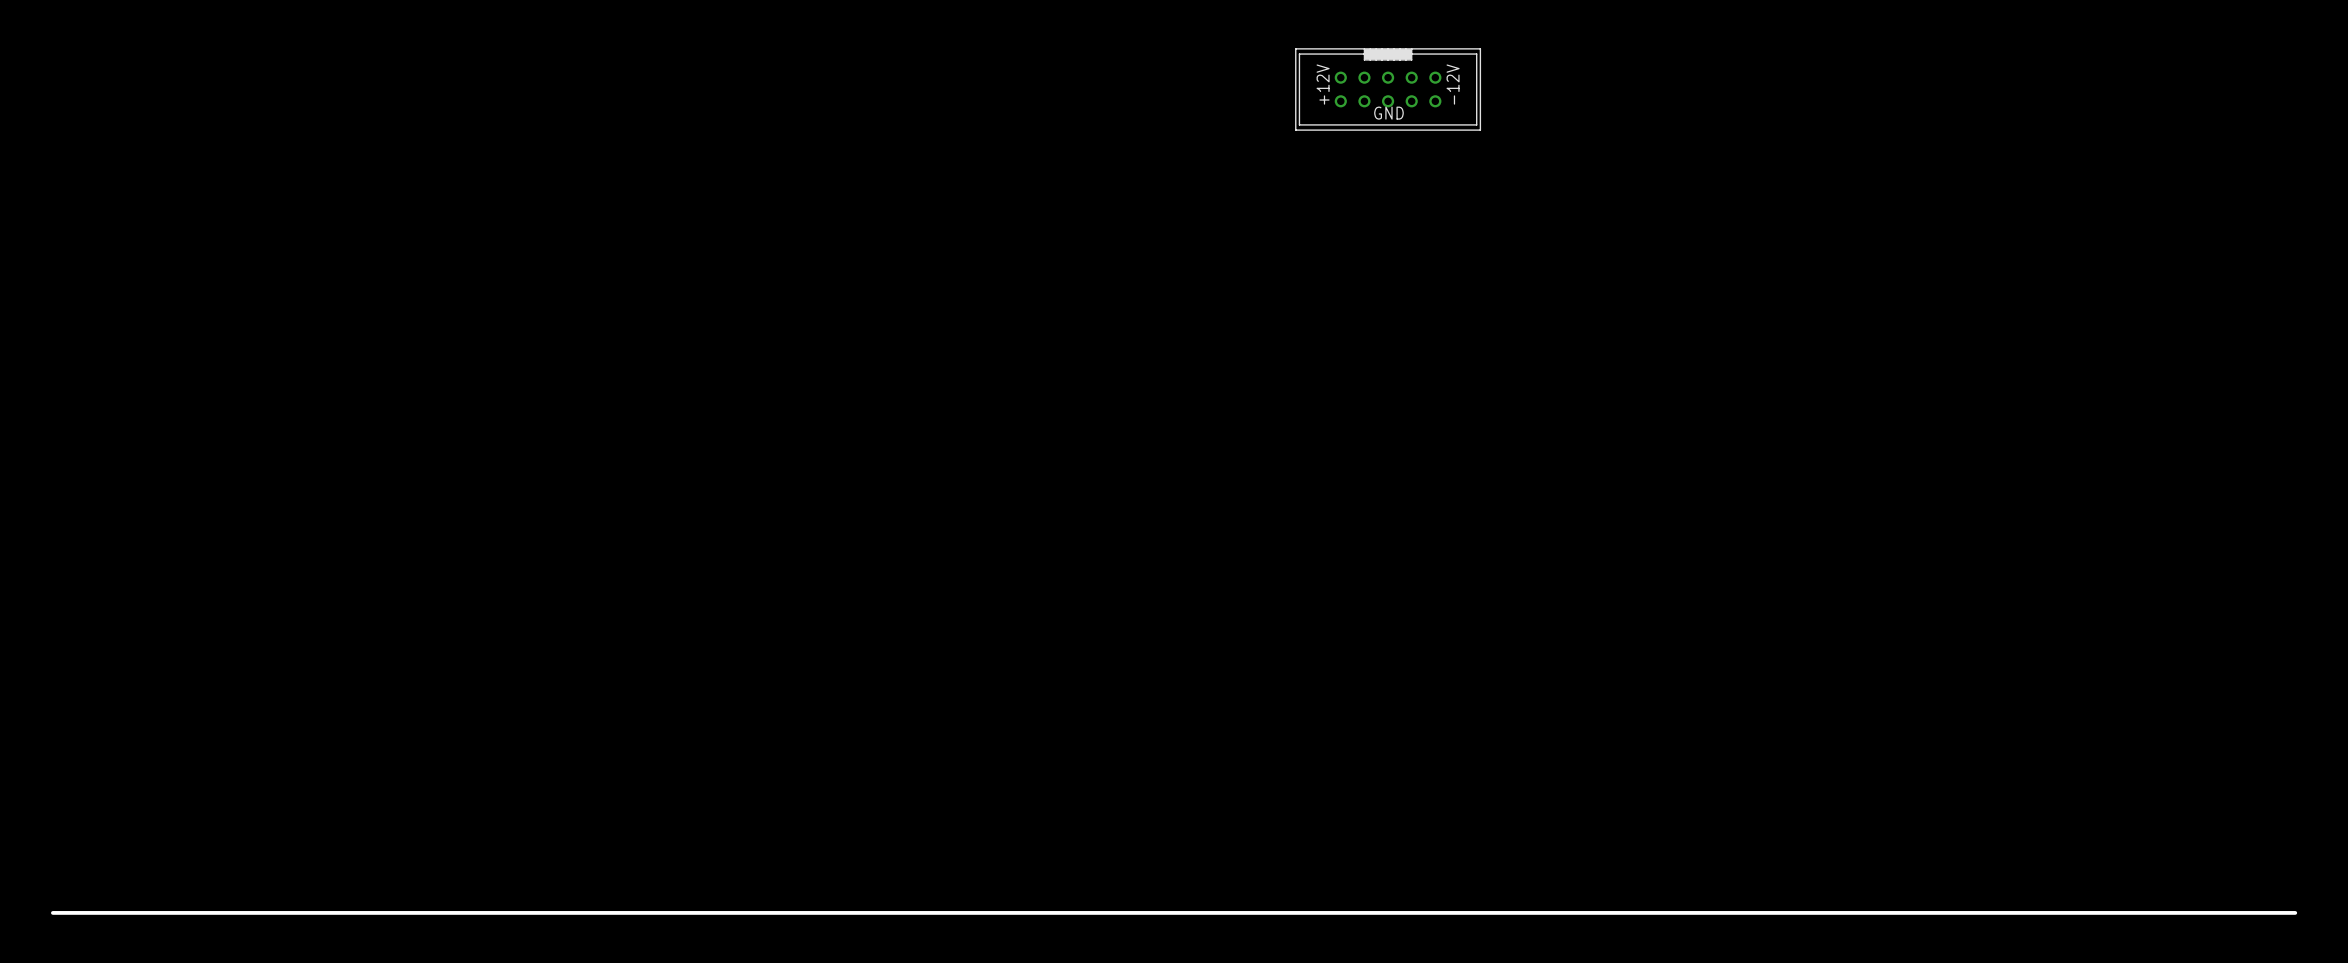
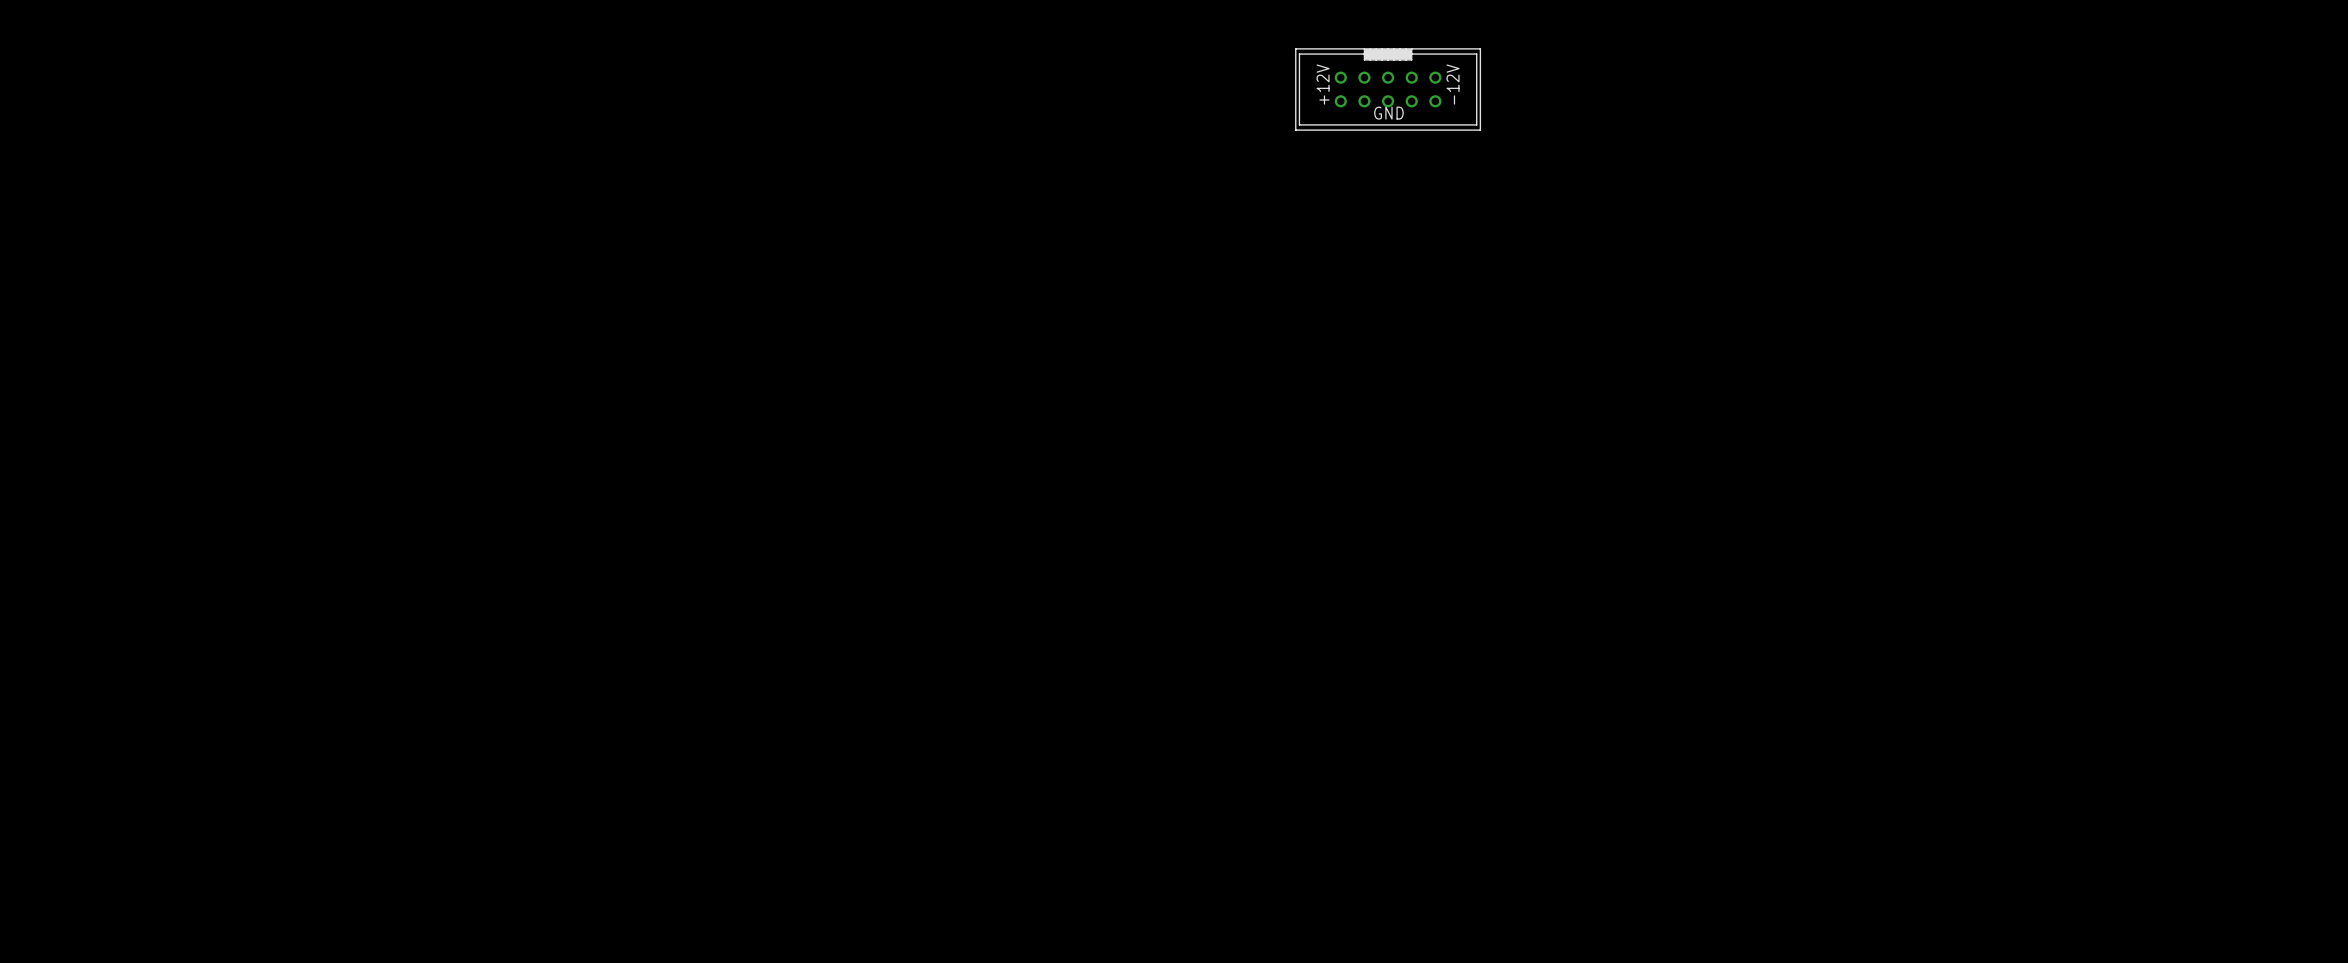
board edge: (52, 912) (2295, 912) -> none

